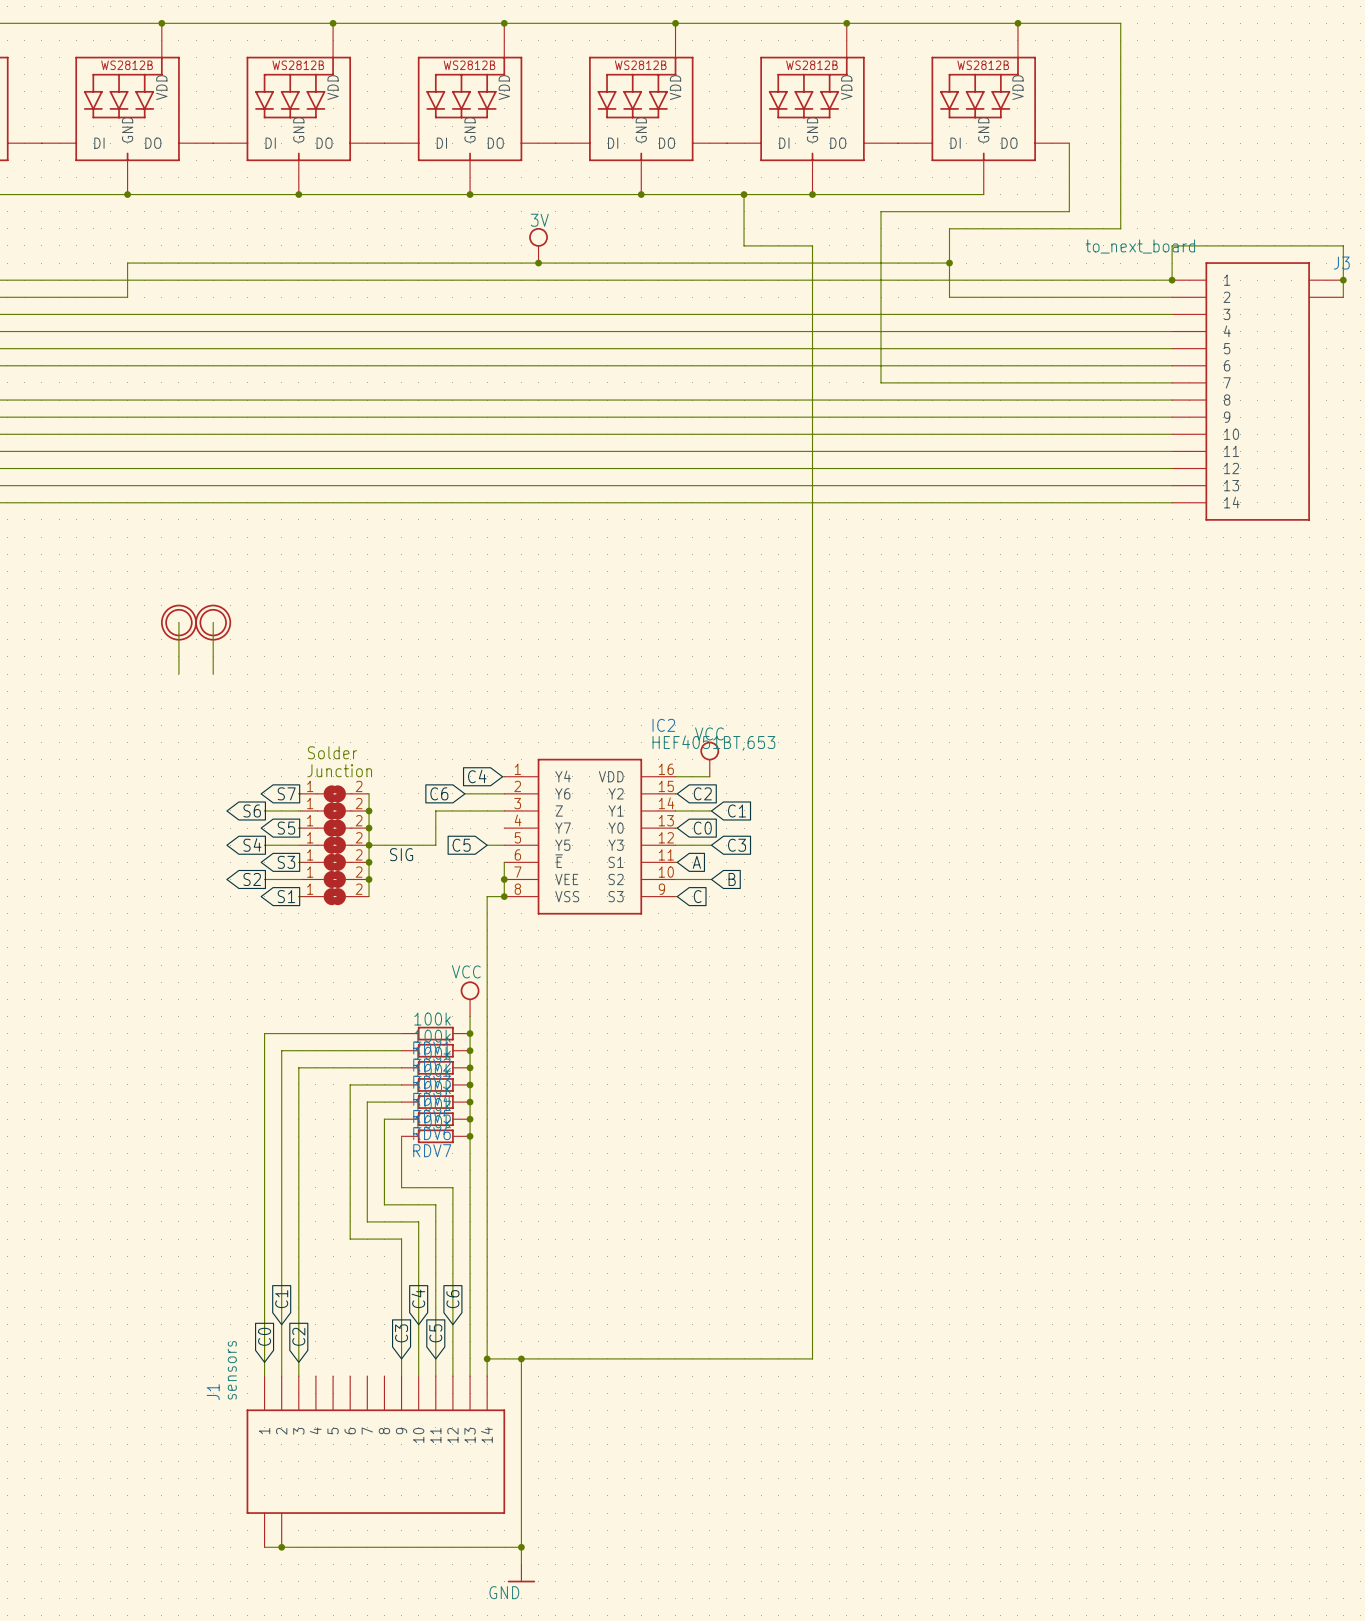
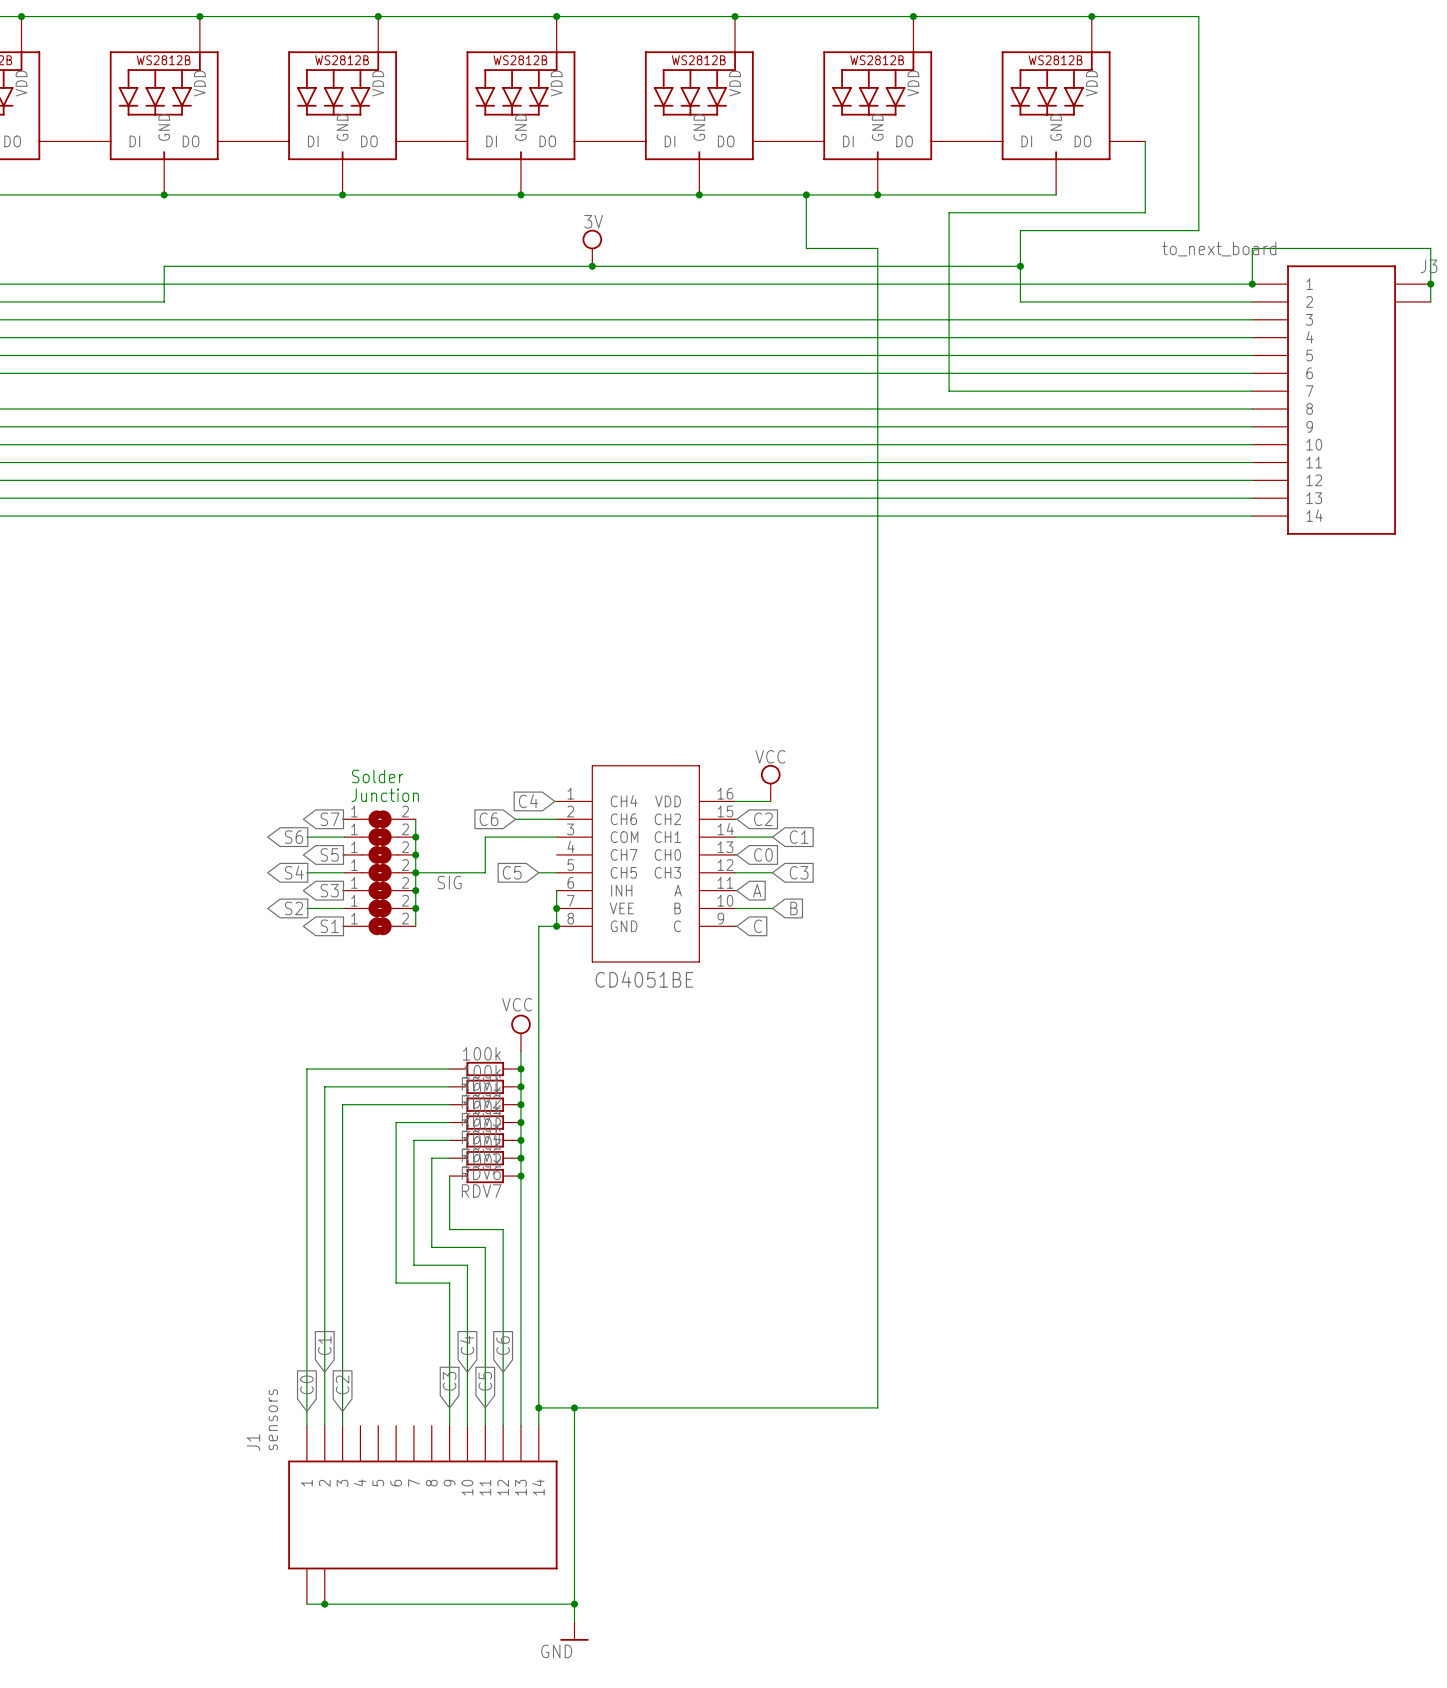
wire: (178, 622) (178, 674) -> none
part: (178, 622) -> none
wire: (213, 622) (213, 674) -> none
part: (213, 622) -> none
IC2: HEF4051BT,653 (589, 836) -> none
part: none -> CD4051BE (645, 863)

